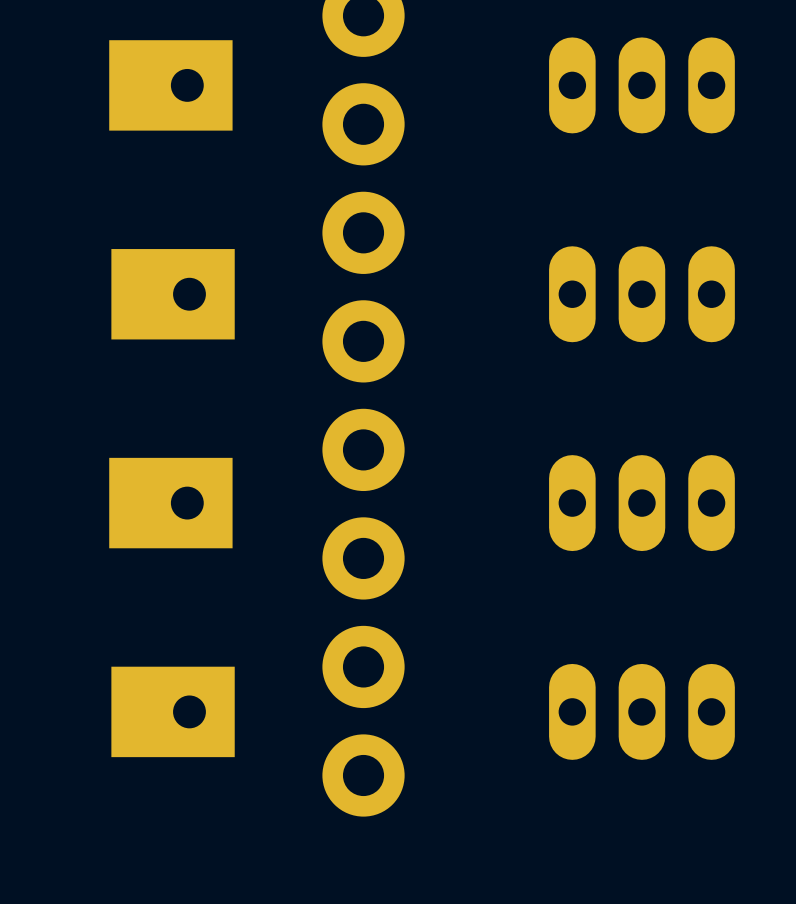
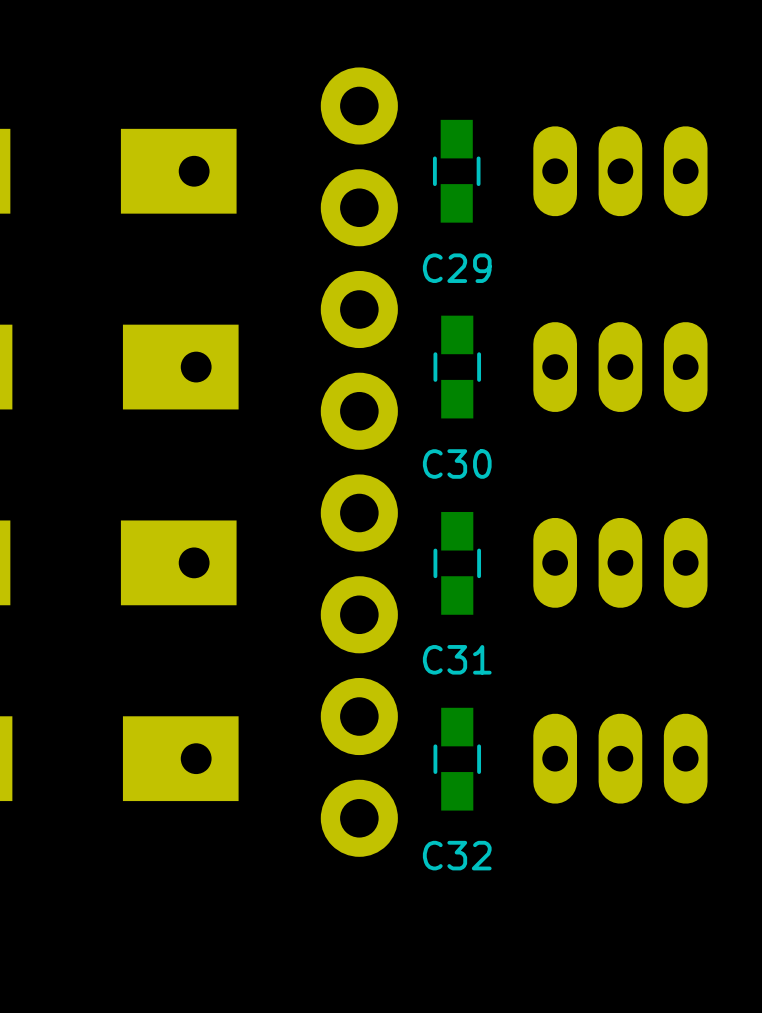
C29: none -> (456, 171)
C30: none -> (457, 367)
C31: none -> (457, 563)
C32: none -> (457, 759)

